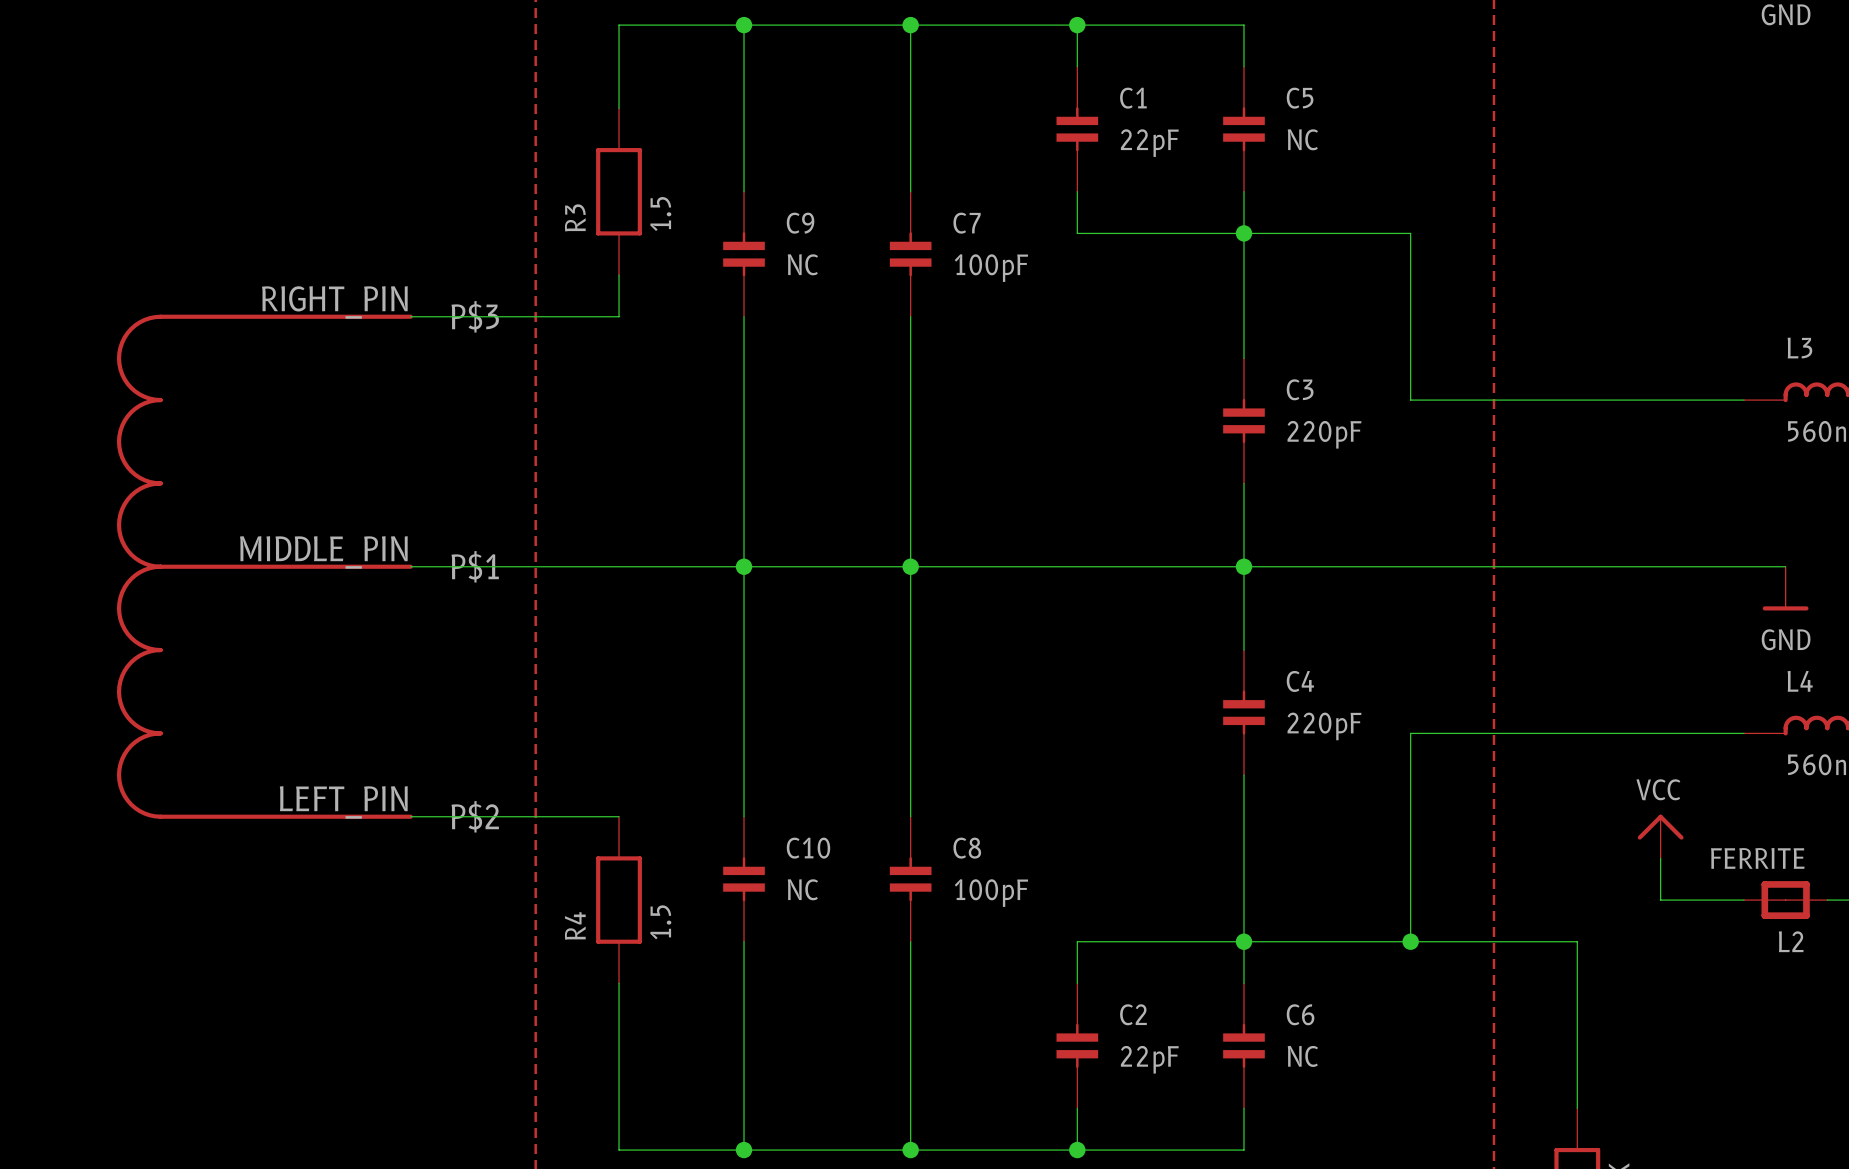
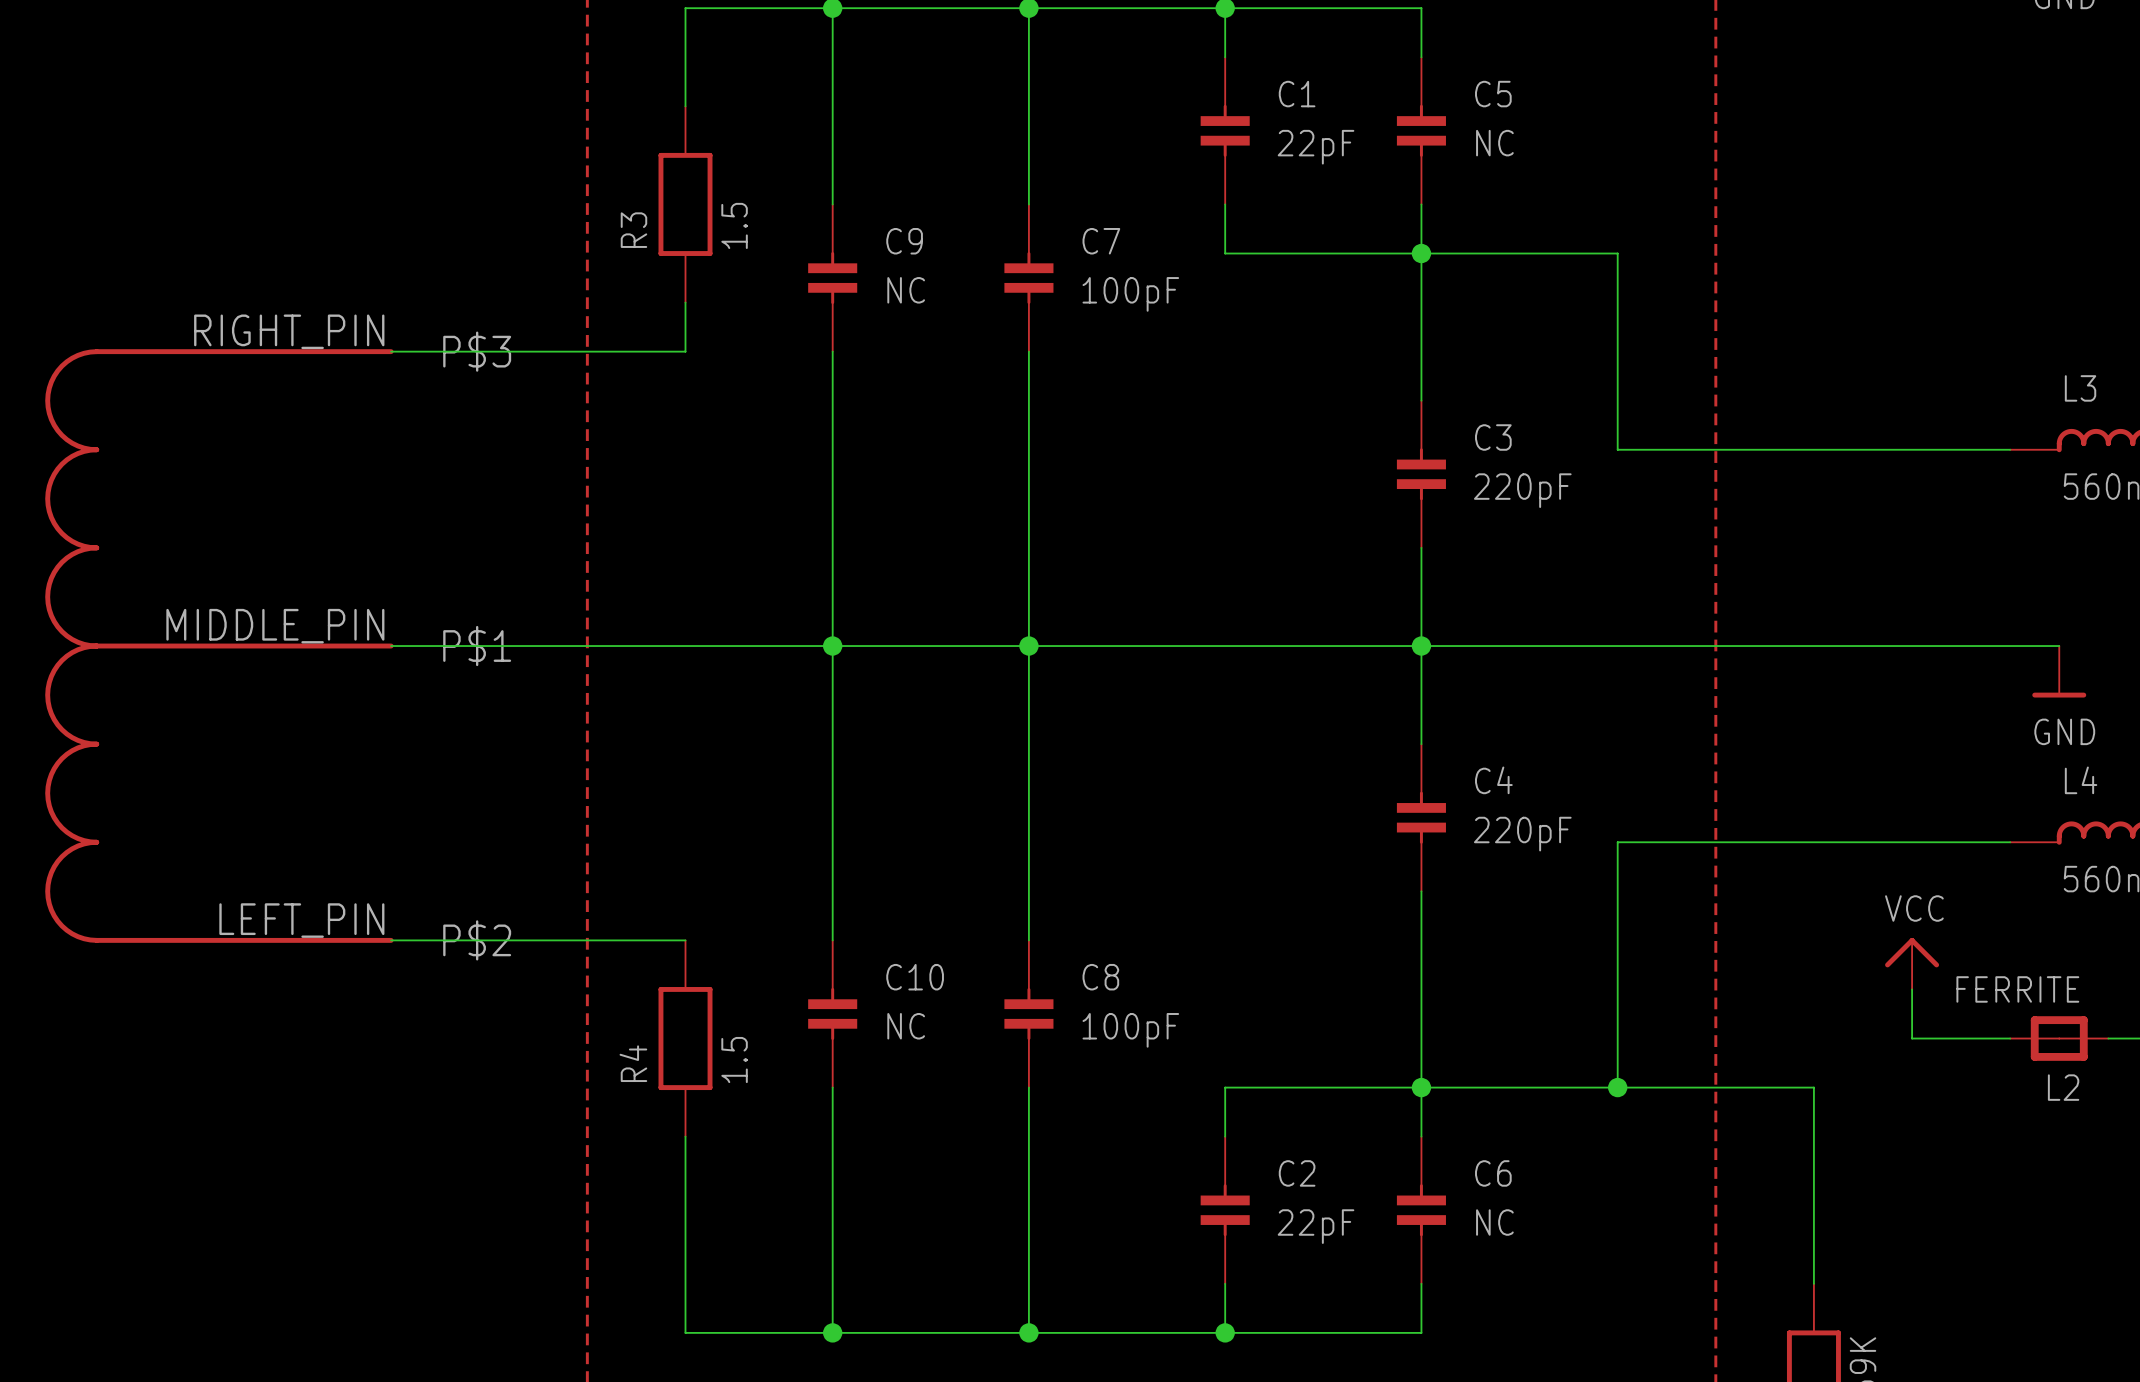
part position: (264, 566) -> (219, 646)

